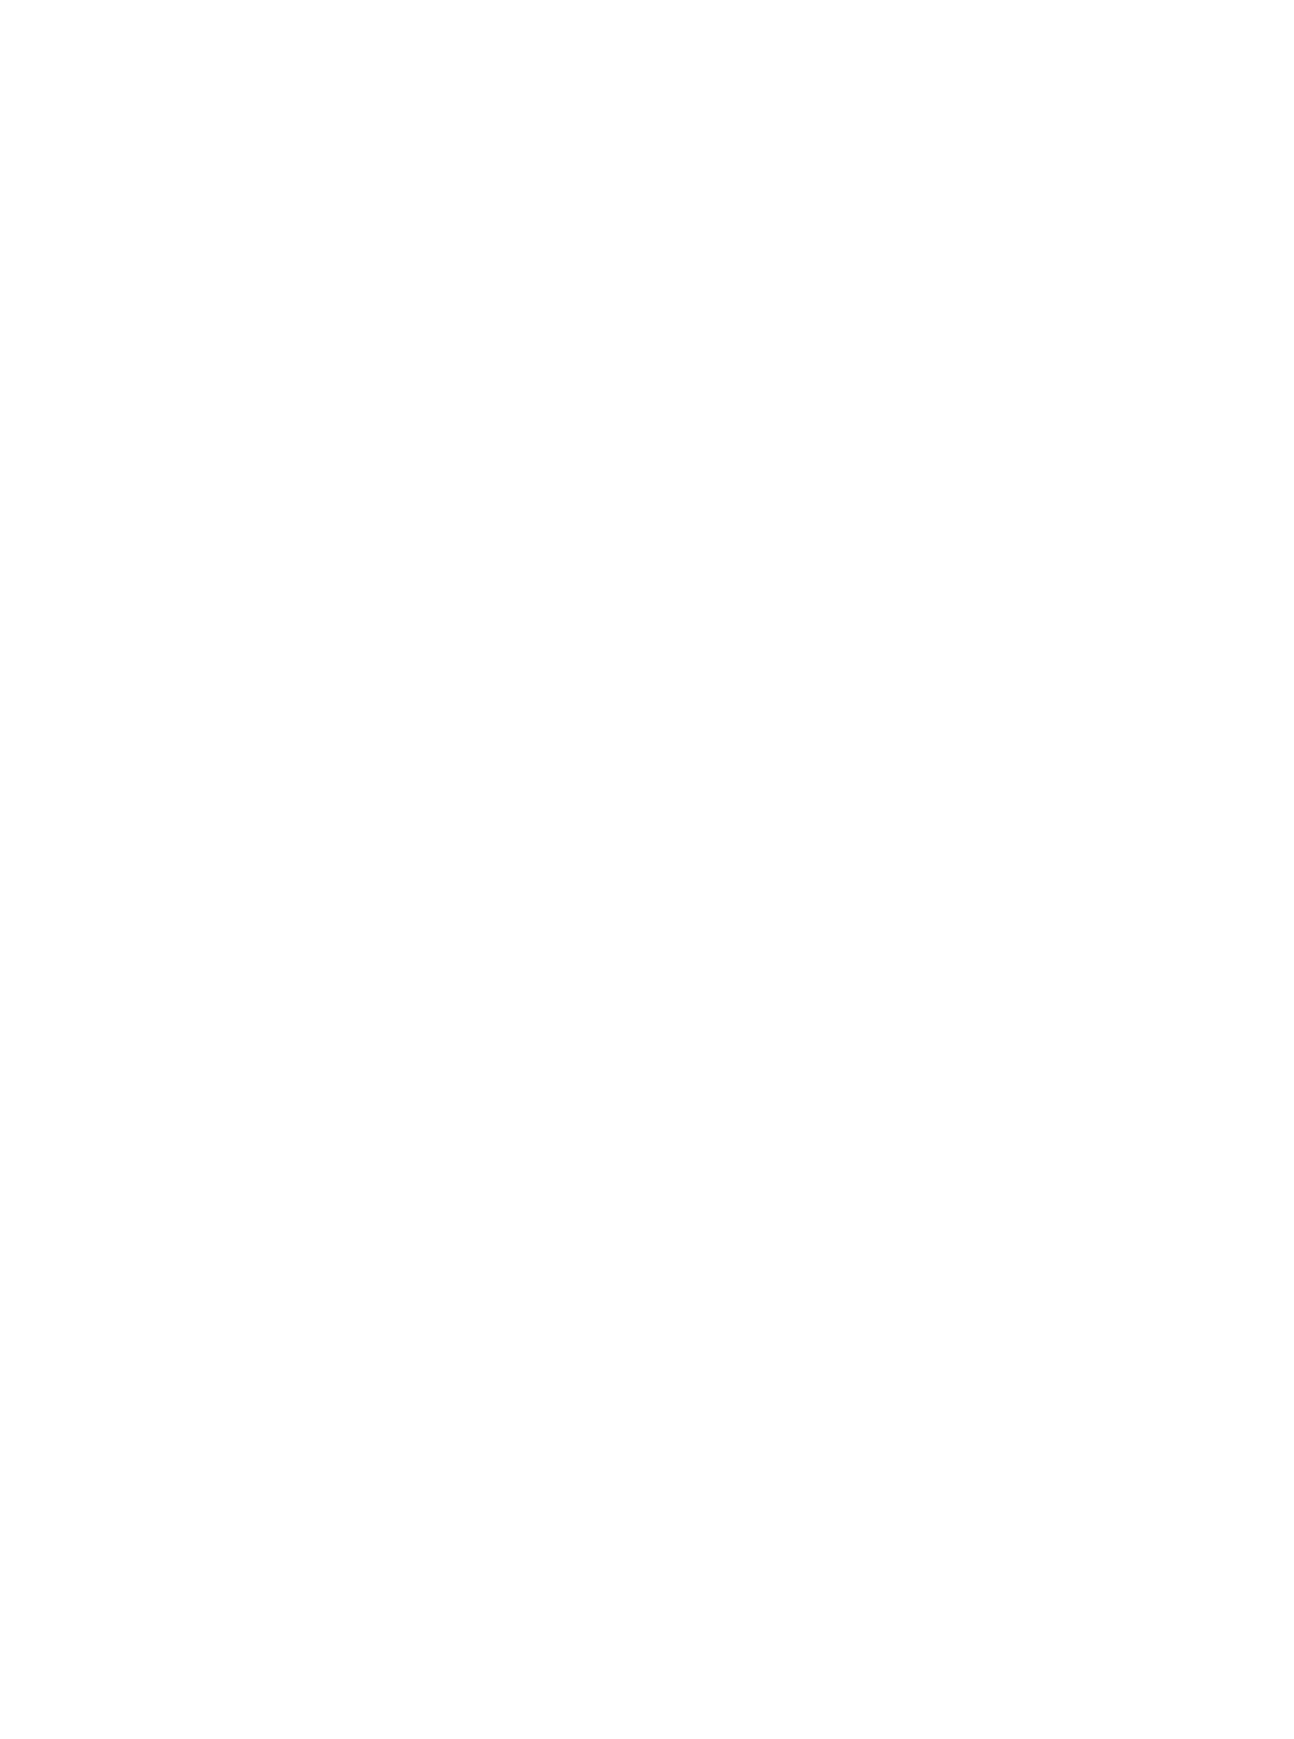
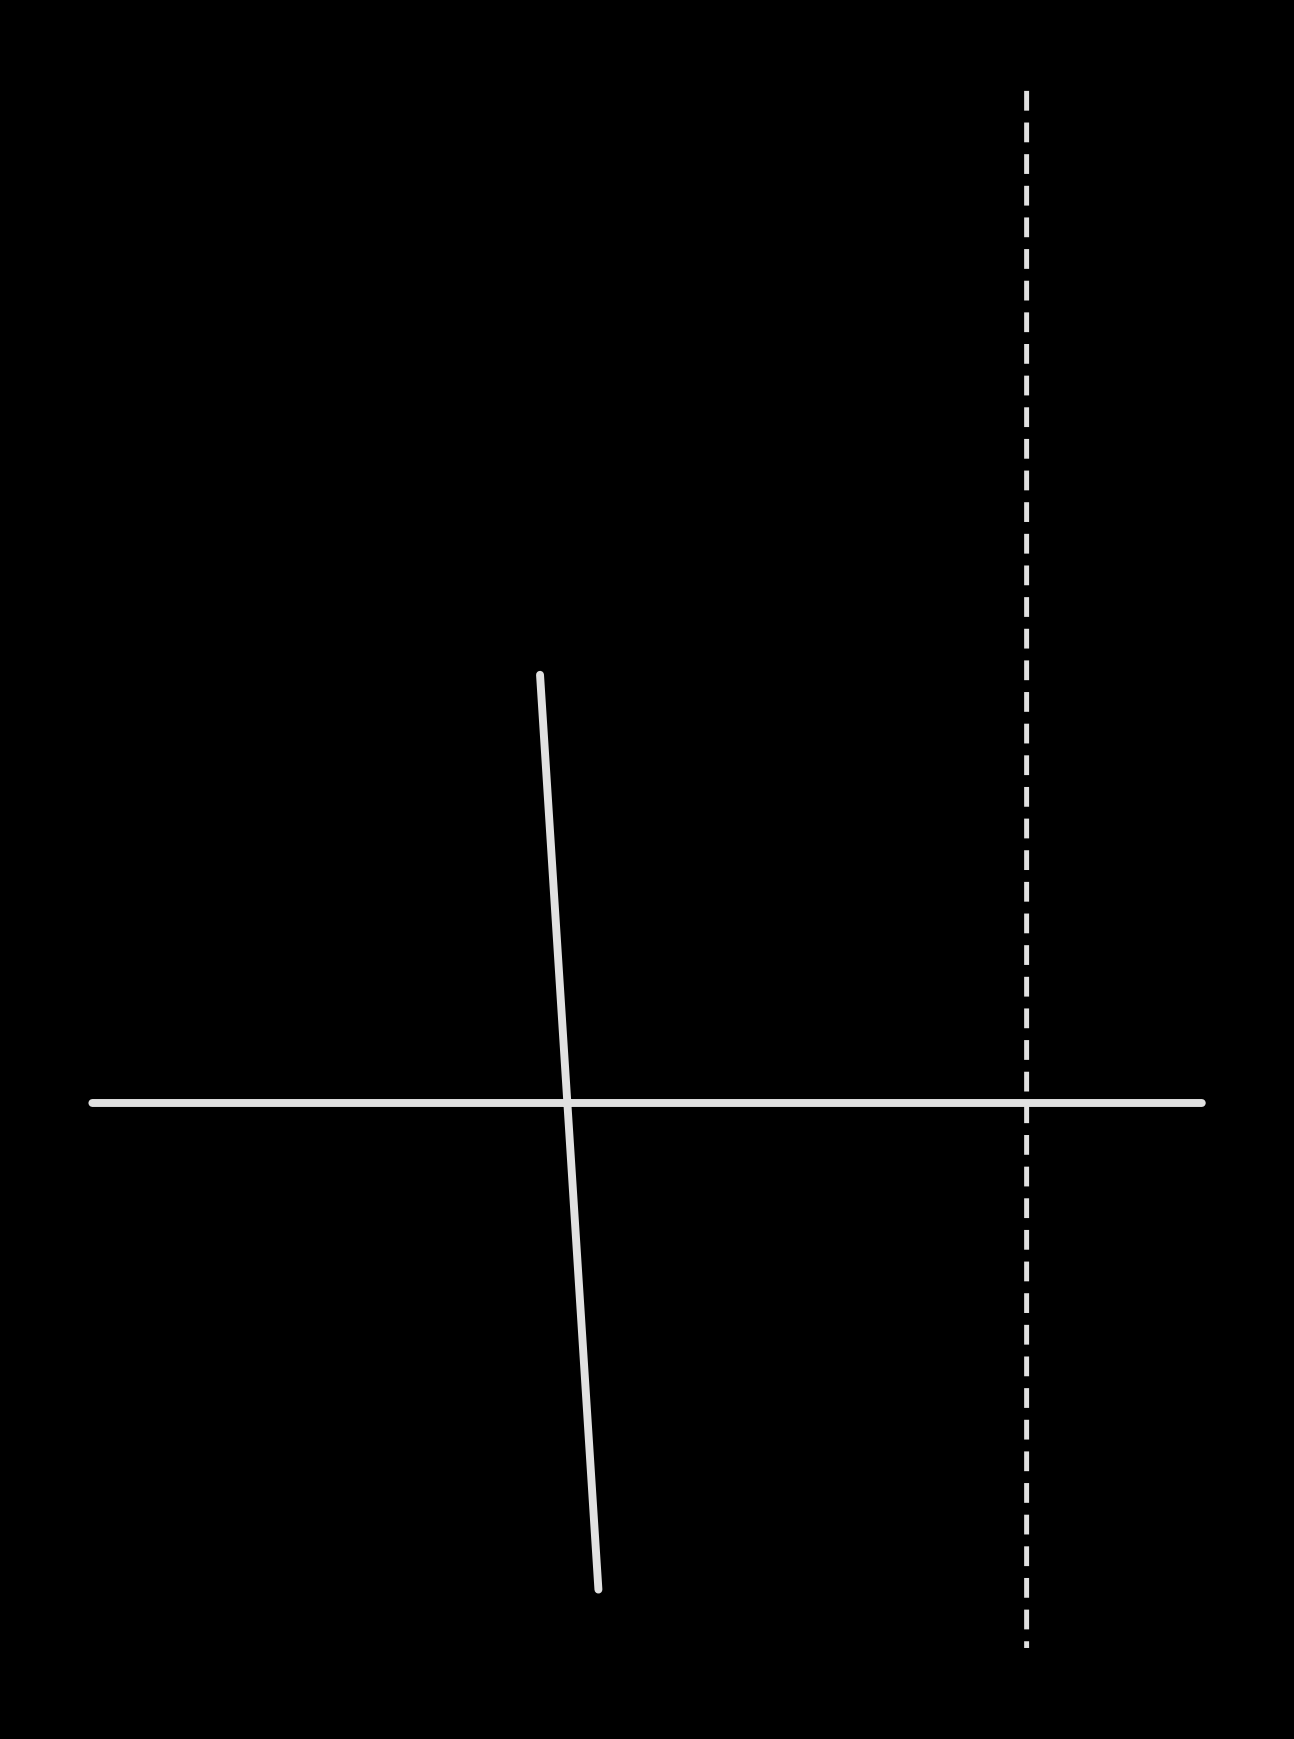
line: none -> (1026, 90) (1026, 1647)
line: none -> (540, 674) (598, 1589)
line: none -> (92, 1102) (1201, 1102)

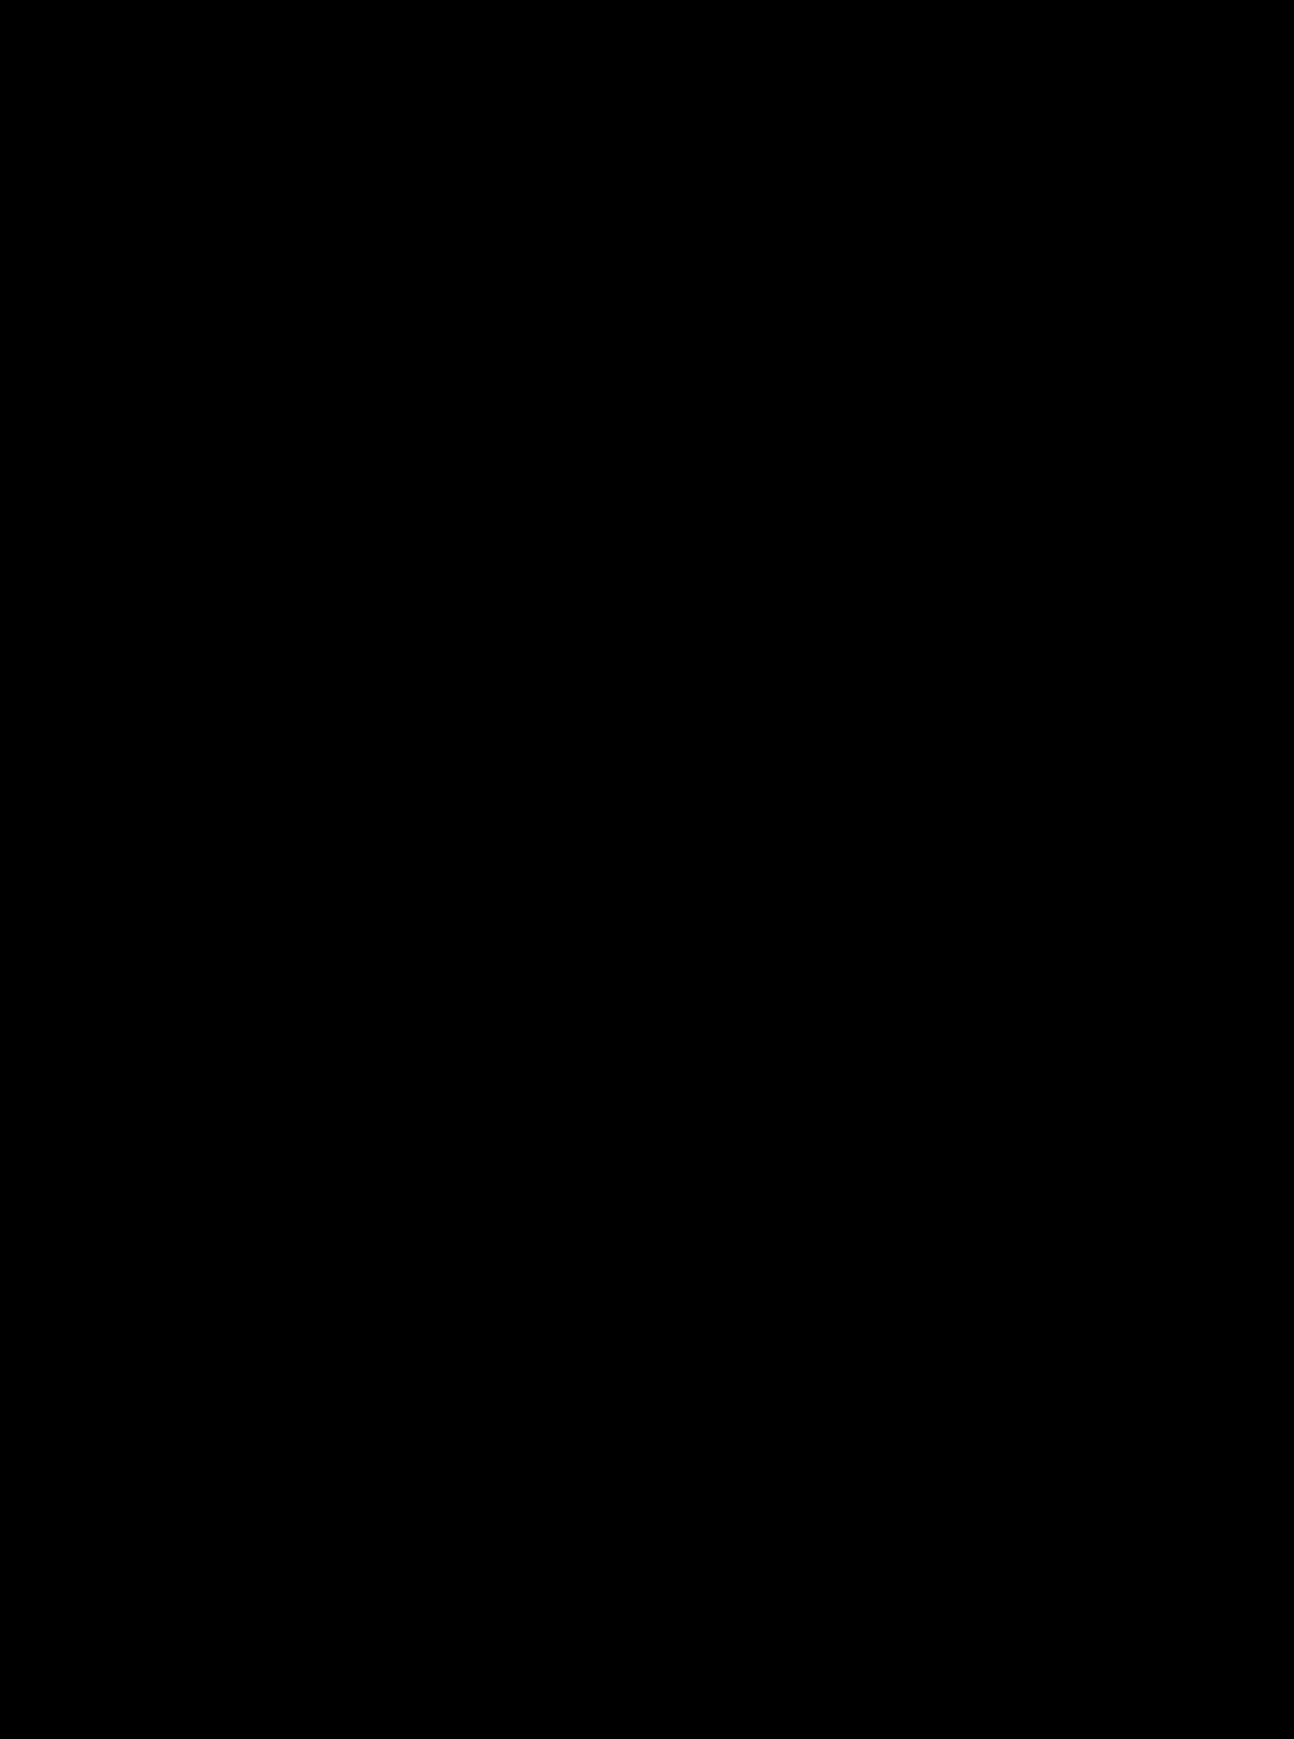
line: (1026, 90) (1026, 1647) -> none
line: (540, 674) (598, 1589) -> none
line: (92, 1102) (1201, 1102) -> none

